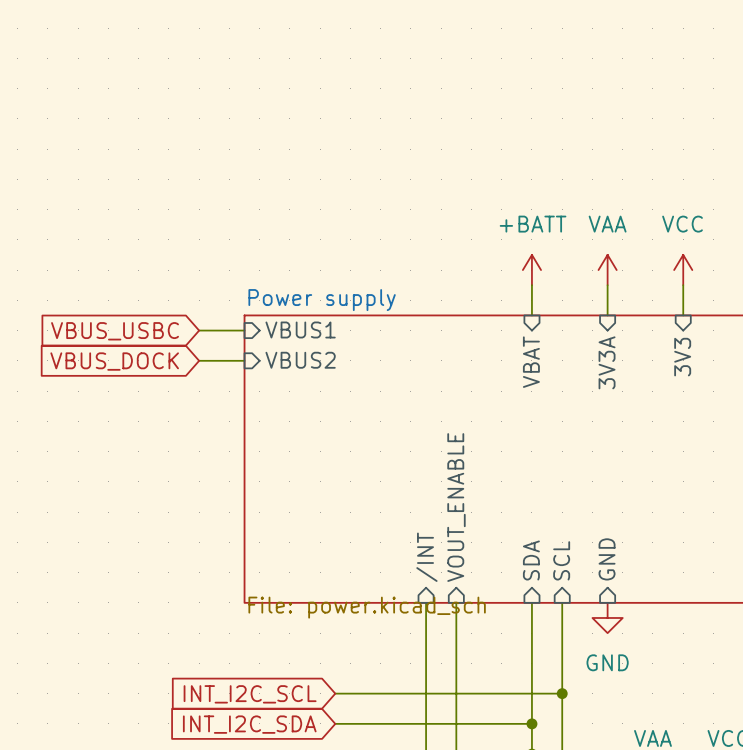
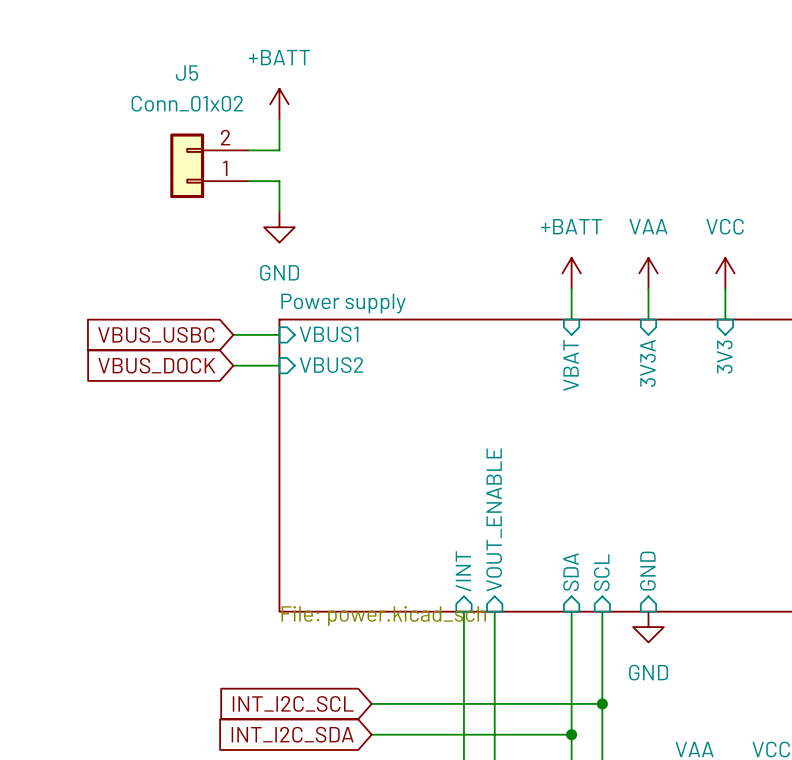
power symbol: none -> +BATT (279, 104)
wire: none -> (279, 119) (279, 150) (248, 150)
J5: none -> Conn_01x02 (209, 165)
wire: none -> (248, 181) (279, 181) (279, 211)
power symbol: none -> GND (279, 227)

